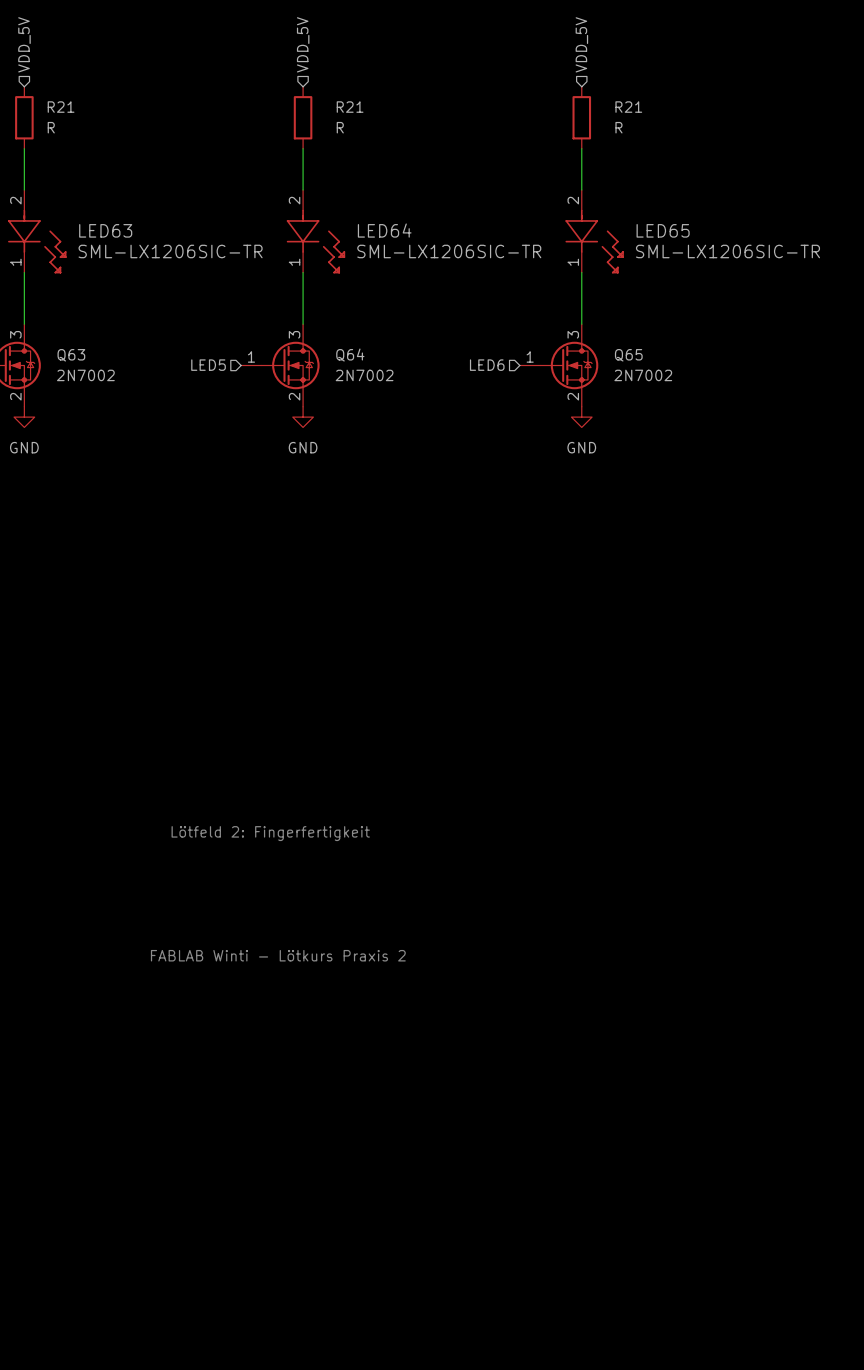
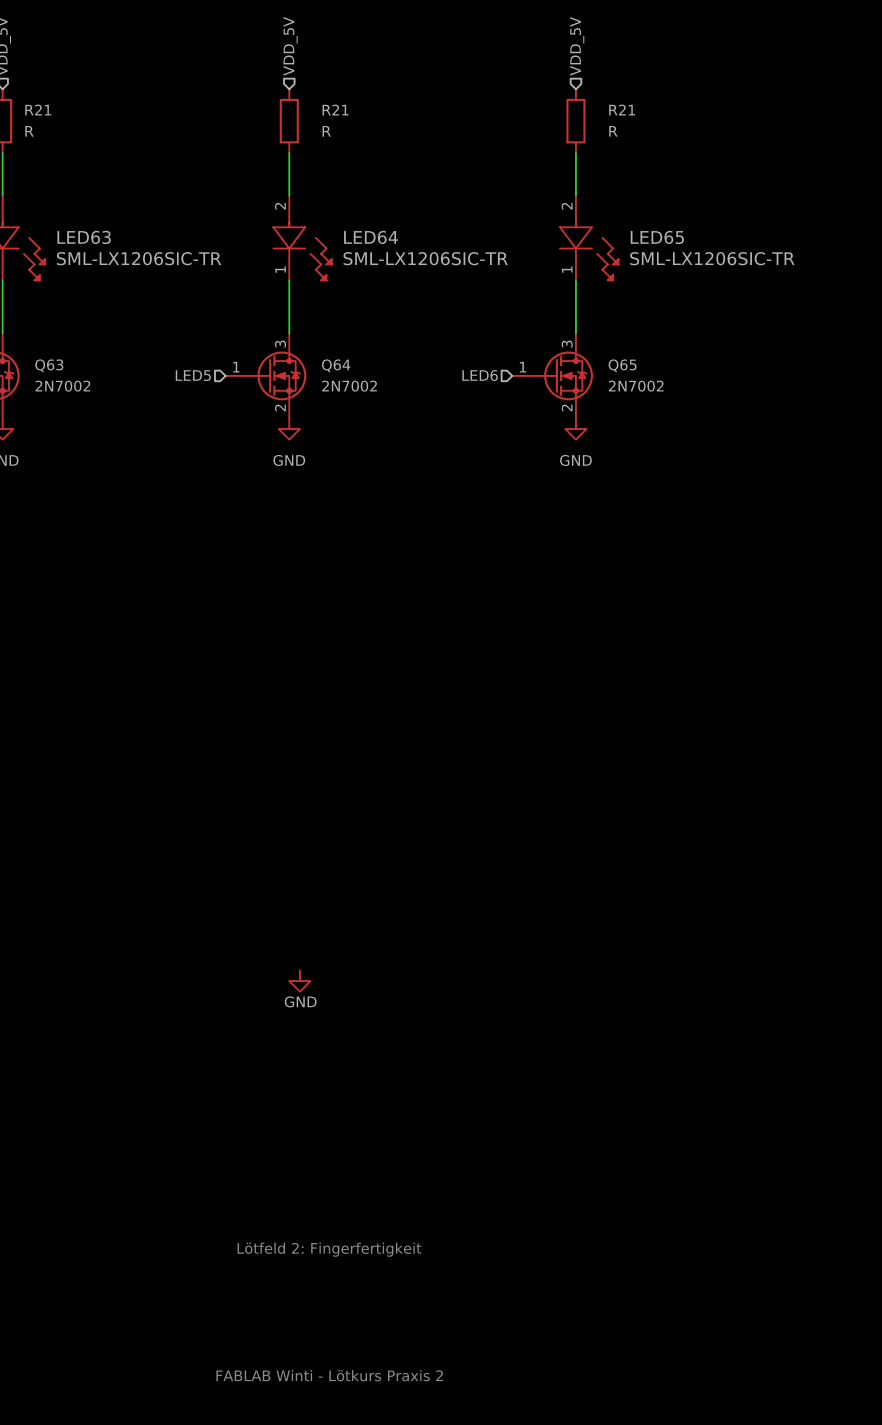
text: Lötfeld 2: Fingerfertigkeit (270, 833) -> none
power symbol: none -> GND (299, 981)
text: FABLAB Winti - Lötkurs Praxis 2 (278, 955) -> none
text: none -> Lötfeld 2: Fingerfertigkeit (329, 1249)
text: none -> FABLAB Winti - Lötkurs Praxis 2 (329, 1375)

